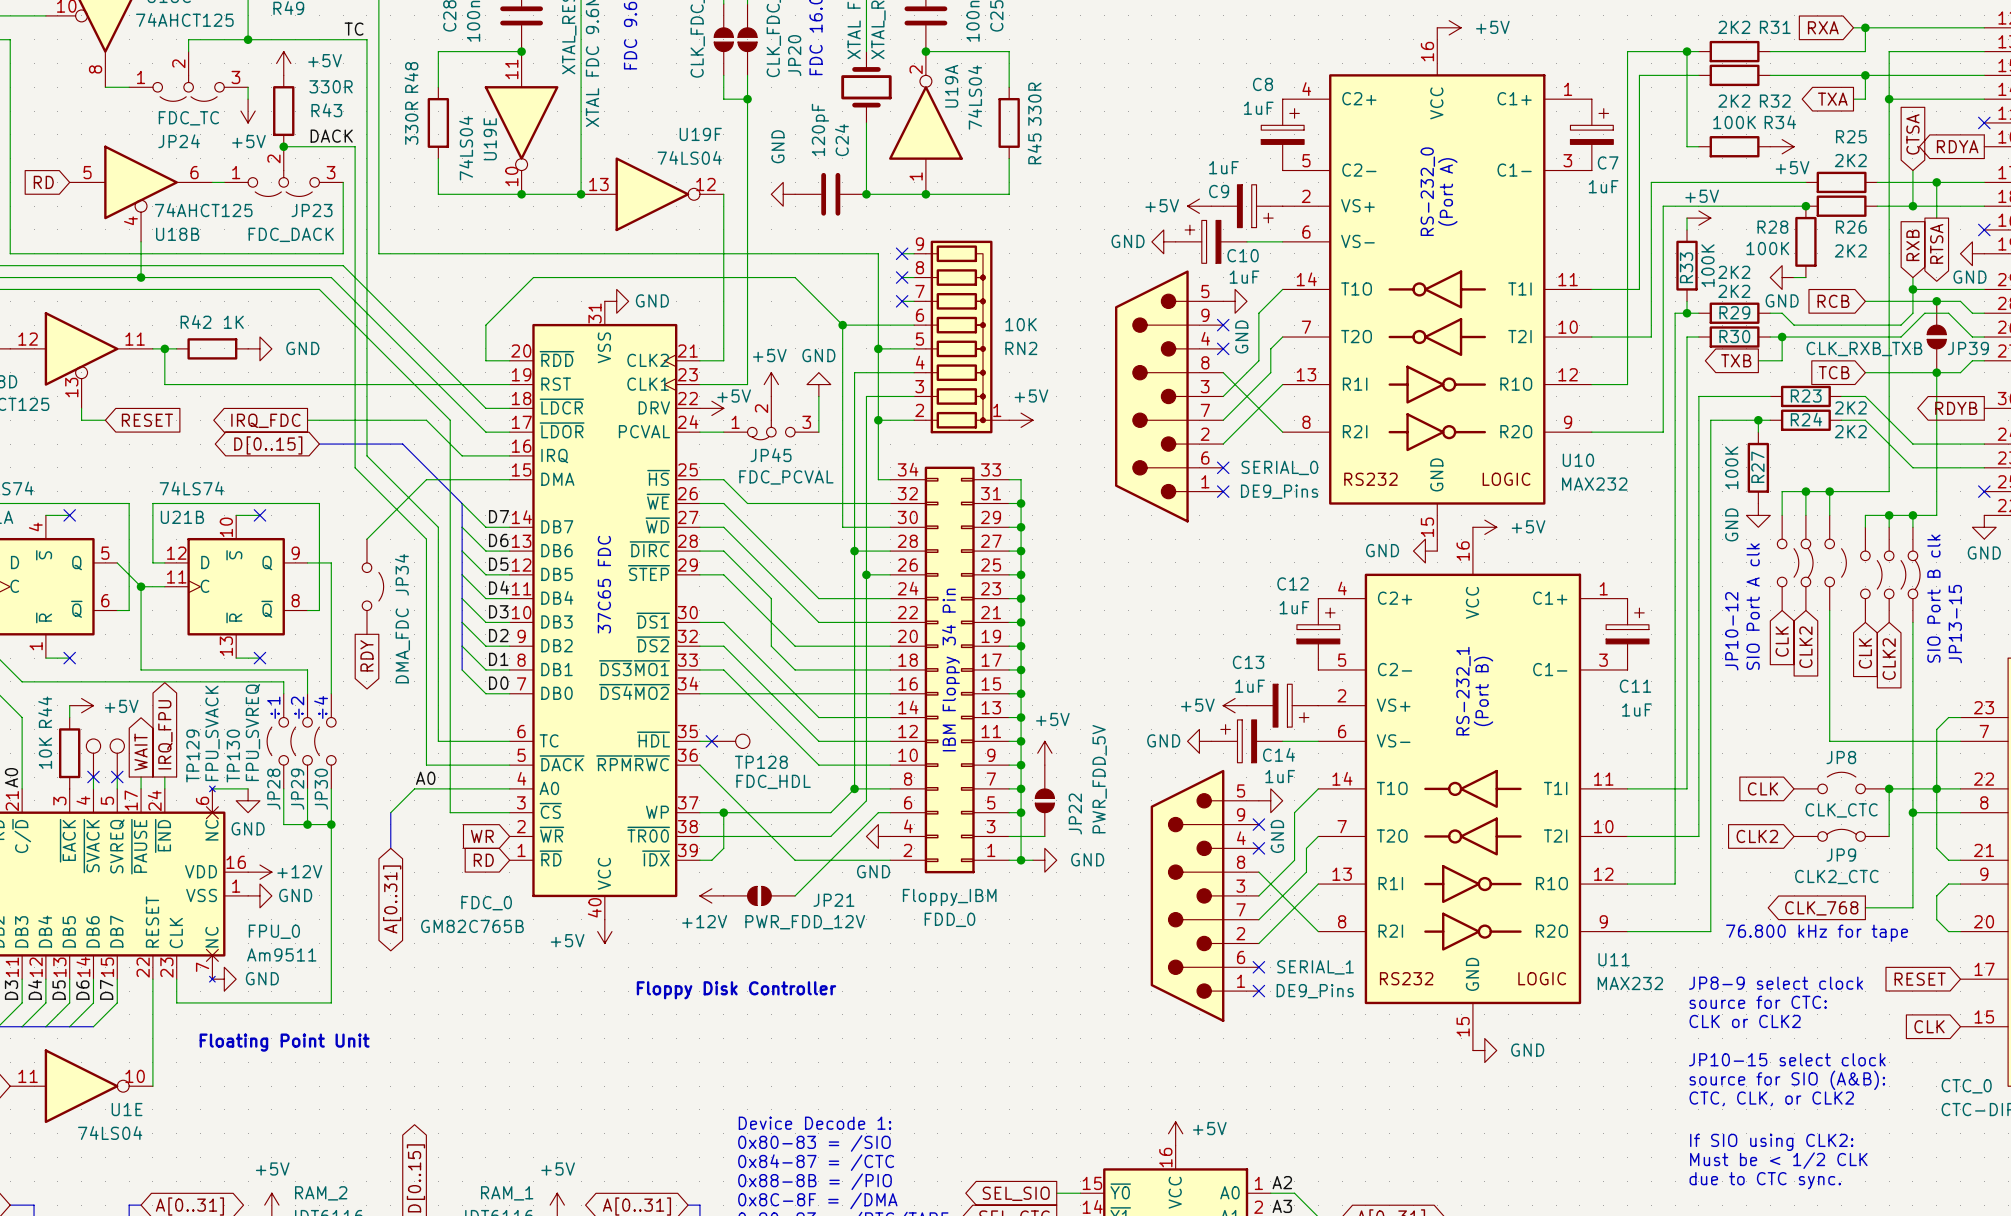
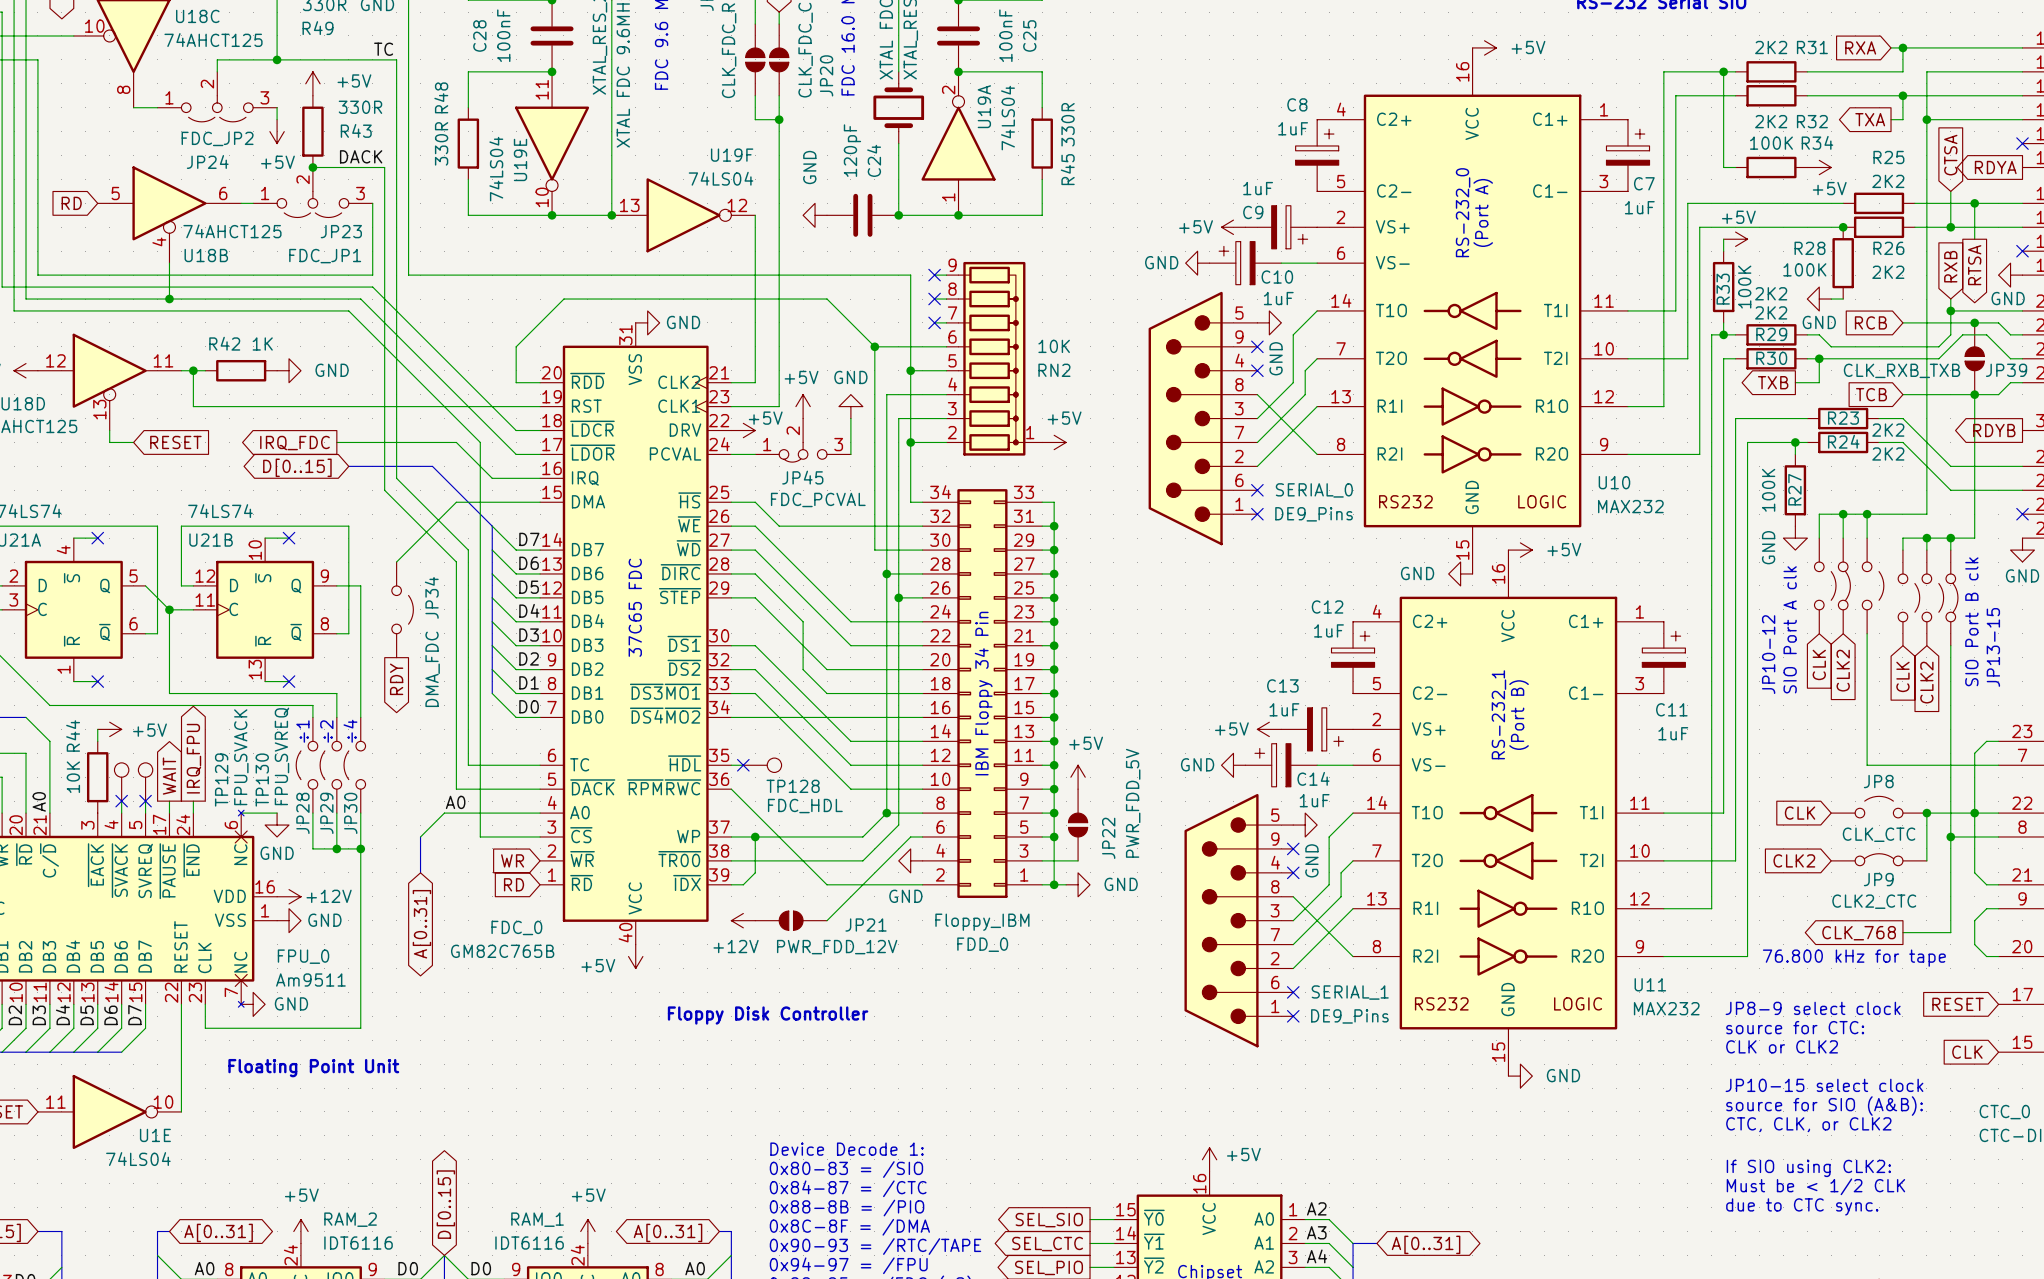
JP24 value: FDC_TC (188, 118) -> FDC_JP2 (217, 138)
JP23 value: FDC_DACK (291, 234) -> FDC_JP1 (325, 256)

